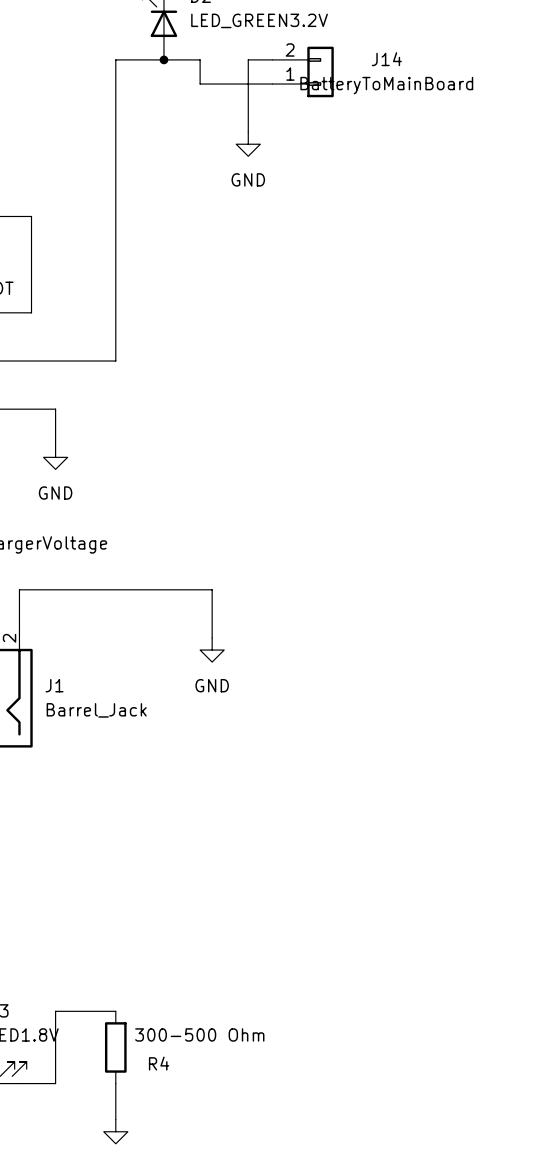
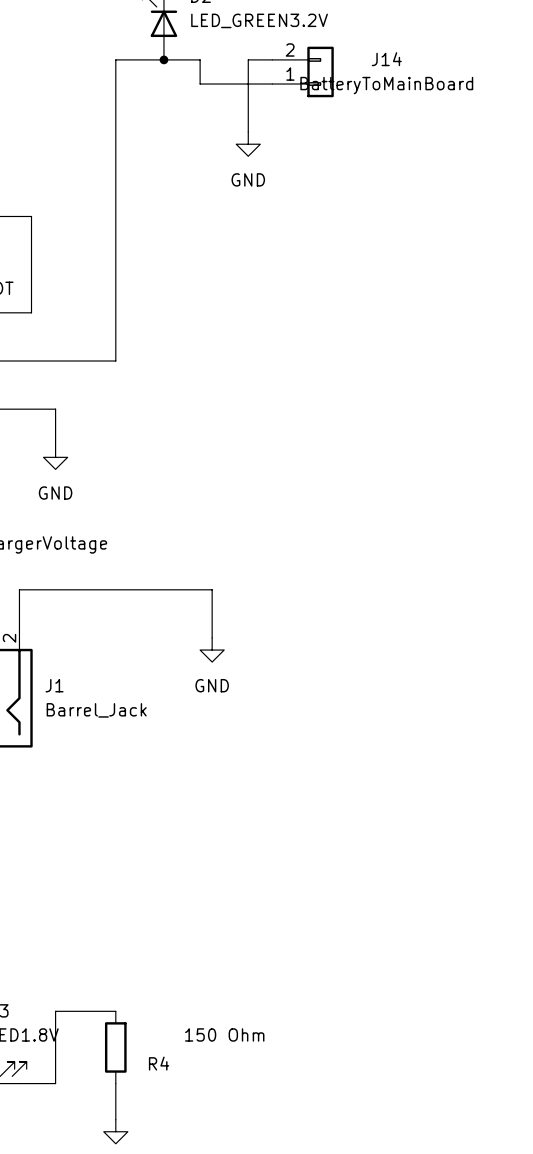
R4 value: 300-500 Ohm (199, 1034) -> 150 Ohm (224, 1034)

